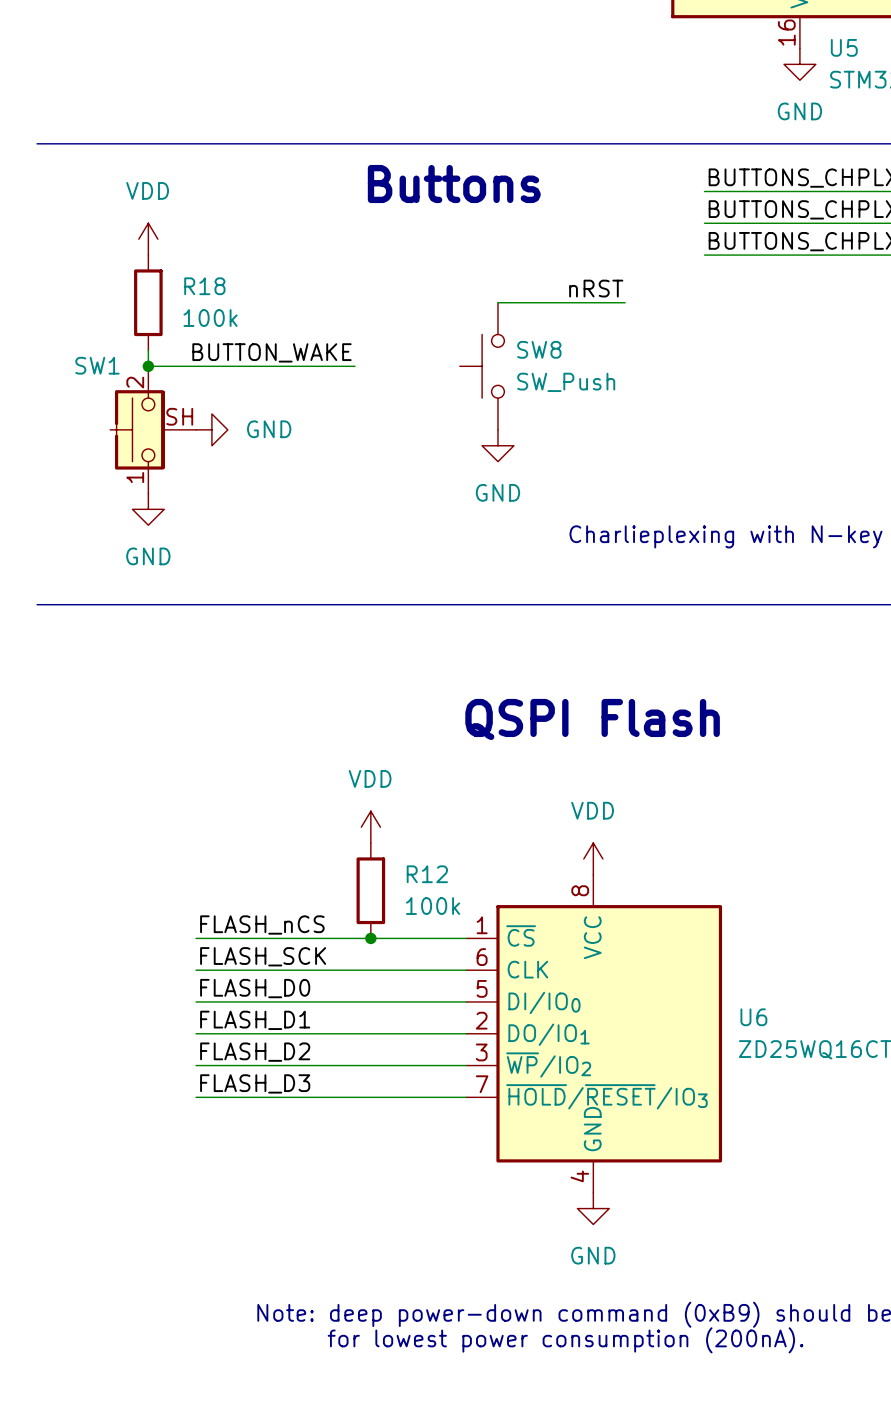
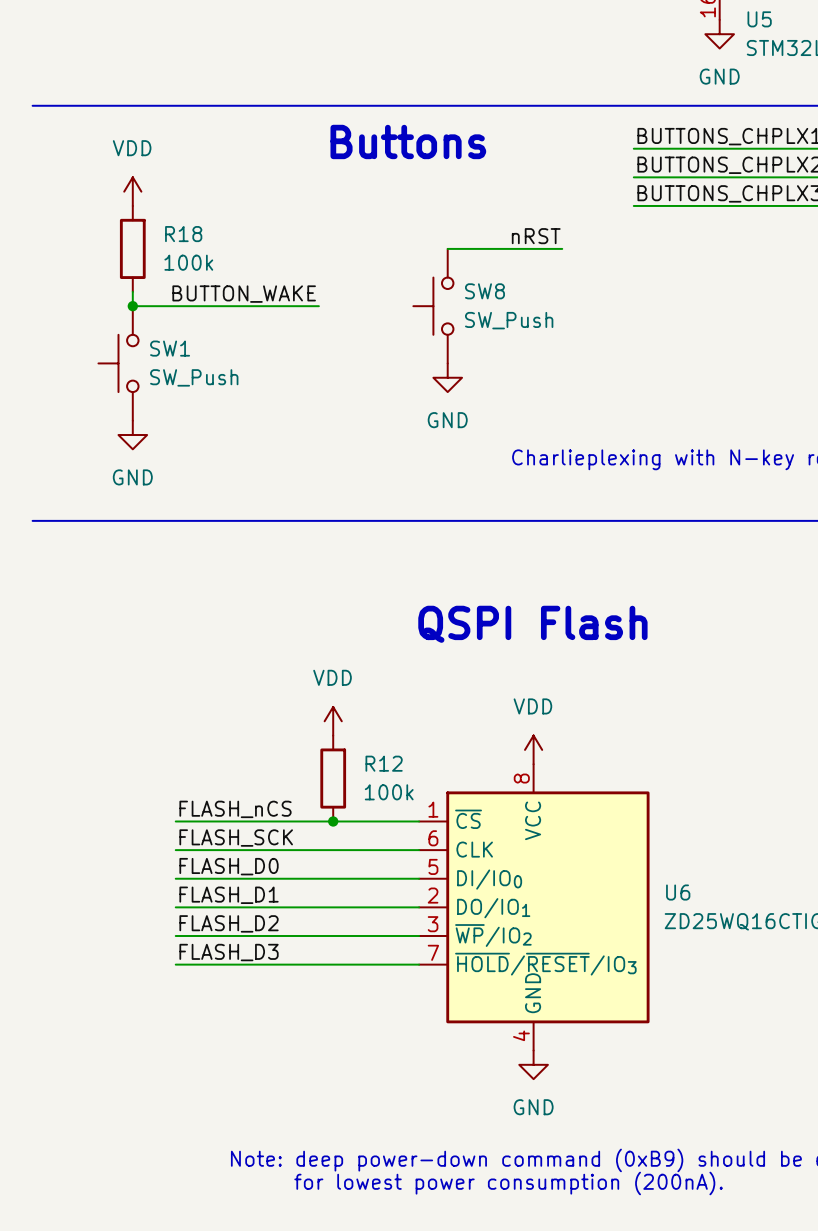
SW1 name position: SW1 (97, 365) -> SW1 (170, 348)
SW1 symbol: [110, 366, 197, 494] -> [98, 306, 139, 421]
power symbol: GND (211, 429) -> none
SW1 value: none -> SW_Push (194, 377)

